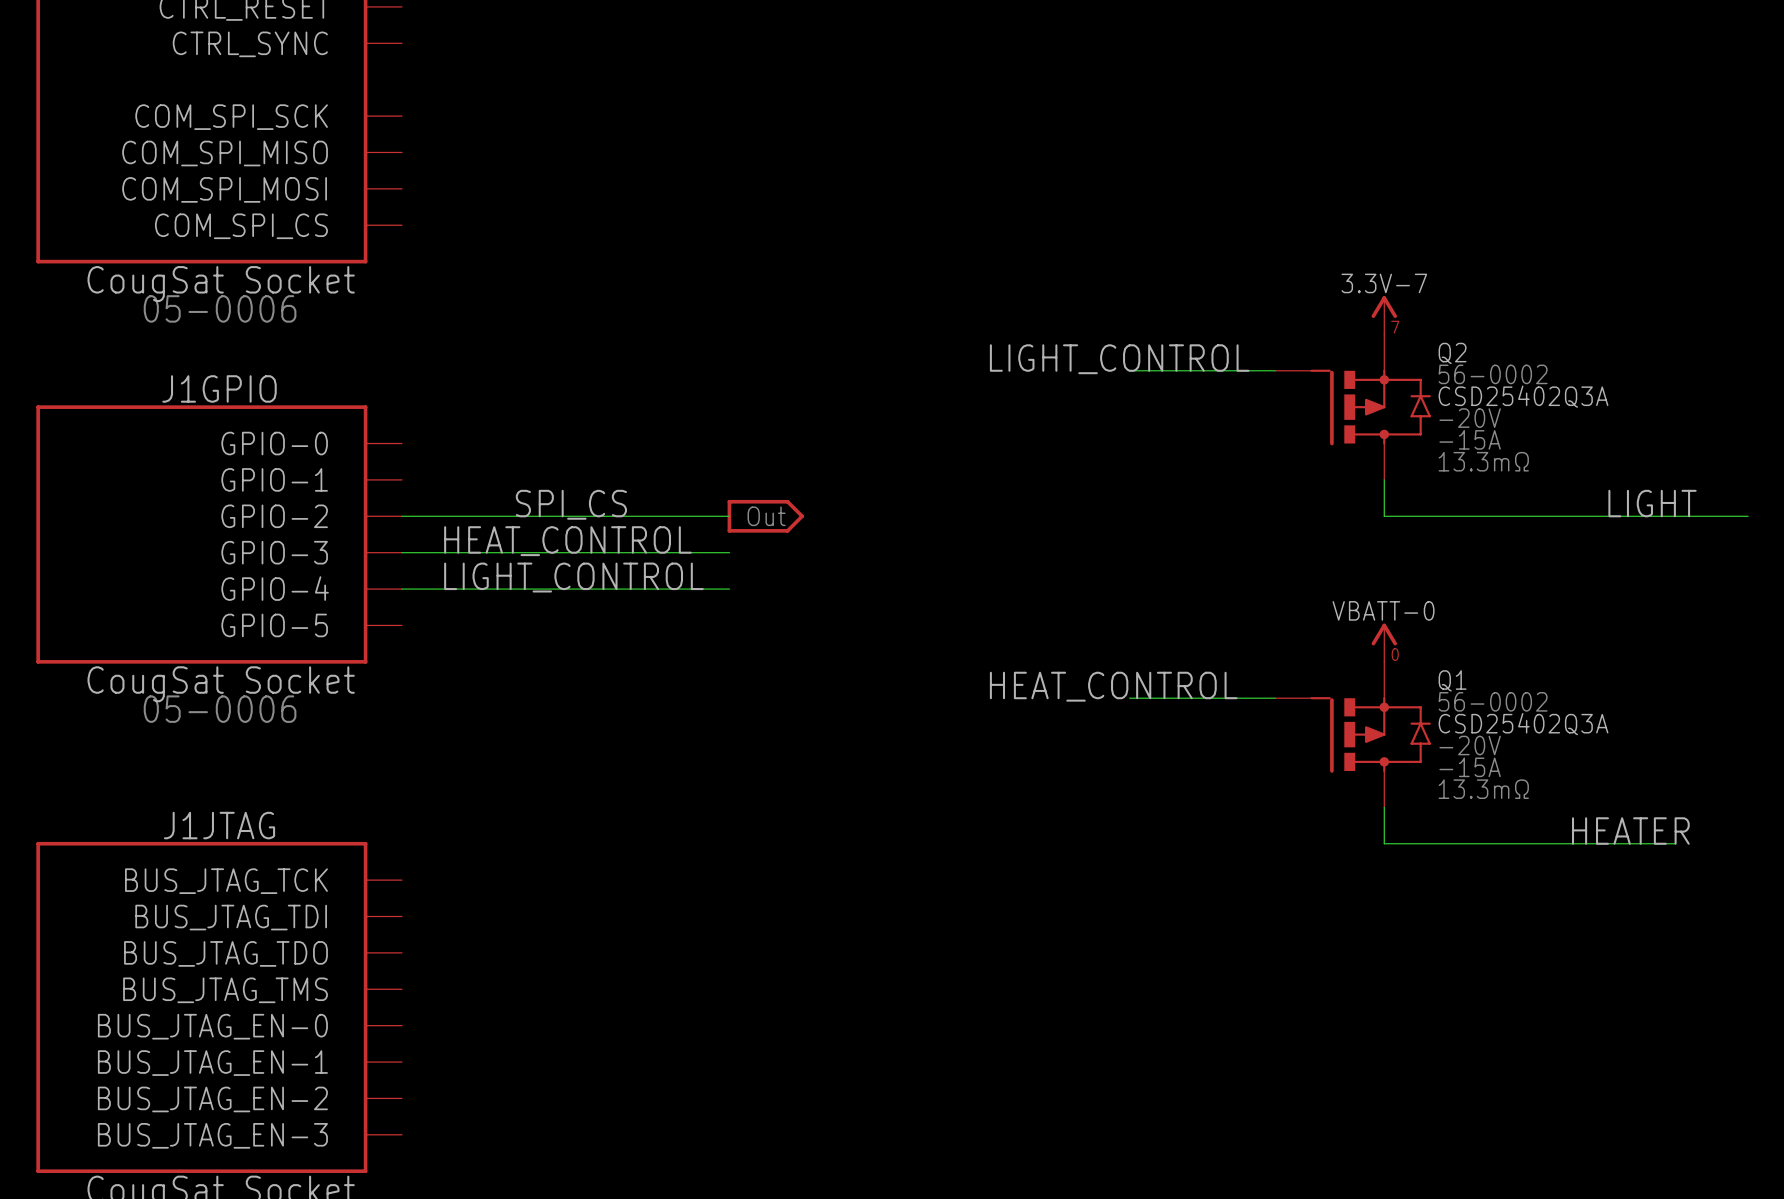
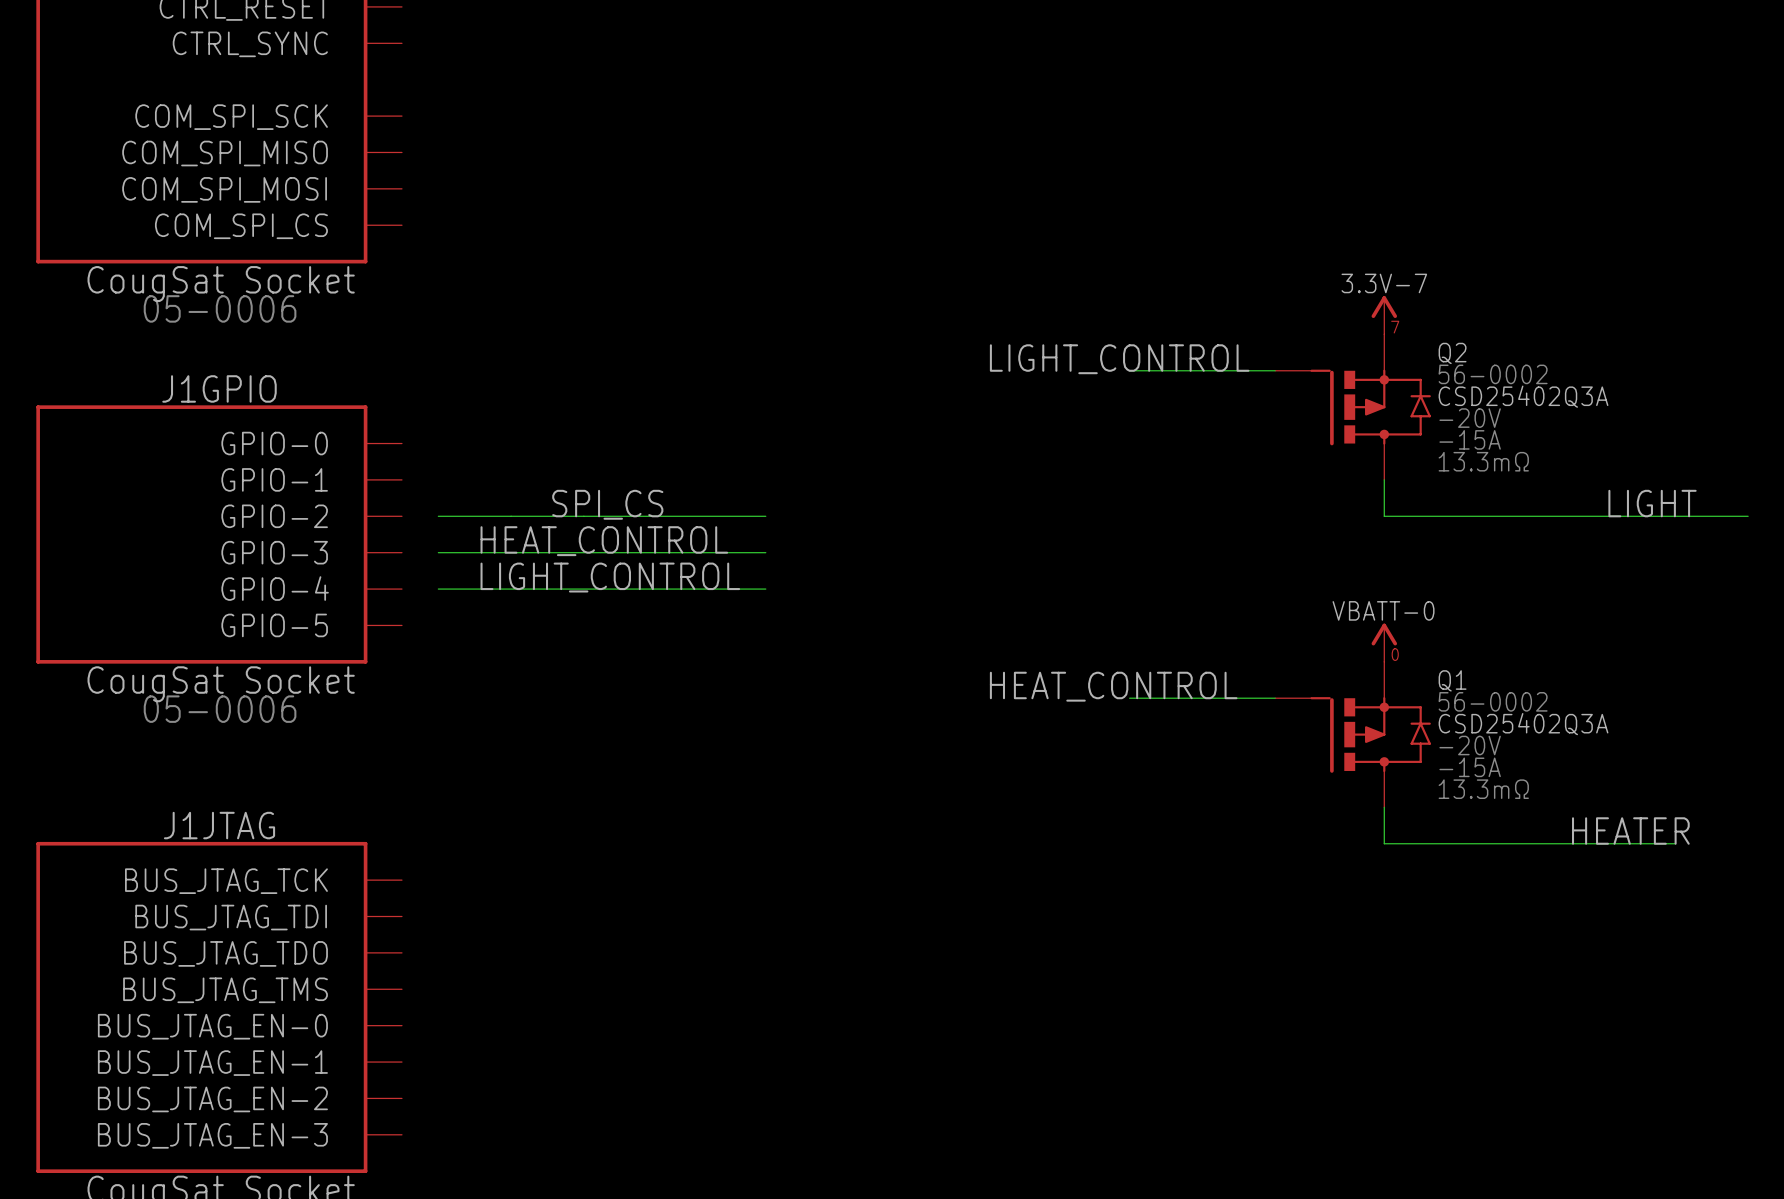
label position: SPI_CS (571, 504) -> SPI_CS (607, 504)
wire: (401, 516) (438, 516) -> (729, 516) (765, 516)
part: (765, 516) -> none
label position: HEAT_CONTROL (567, 541) -> HEAT_CONTROL (604, 541)
wire: (401, 552) (438, 552) -> (729, 552) (765, 552)
label position: LIGHT_CONTROL (573, 577) -> LIGHT_CONTROL (610, 577)
wire: (401, 589) (438, 589) -> (729, 589) (765, 589)

